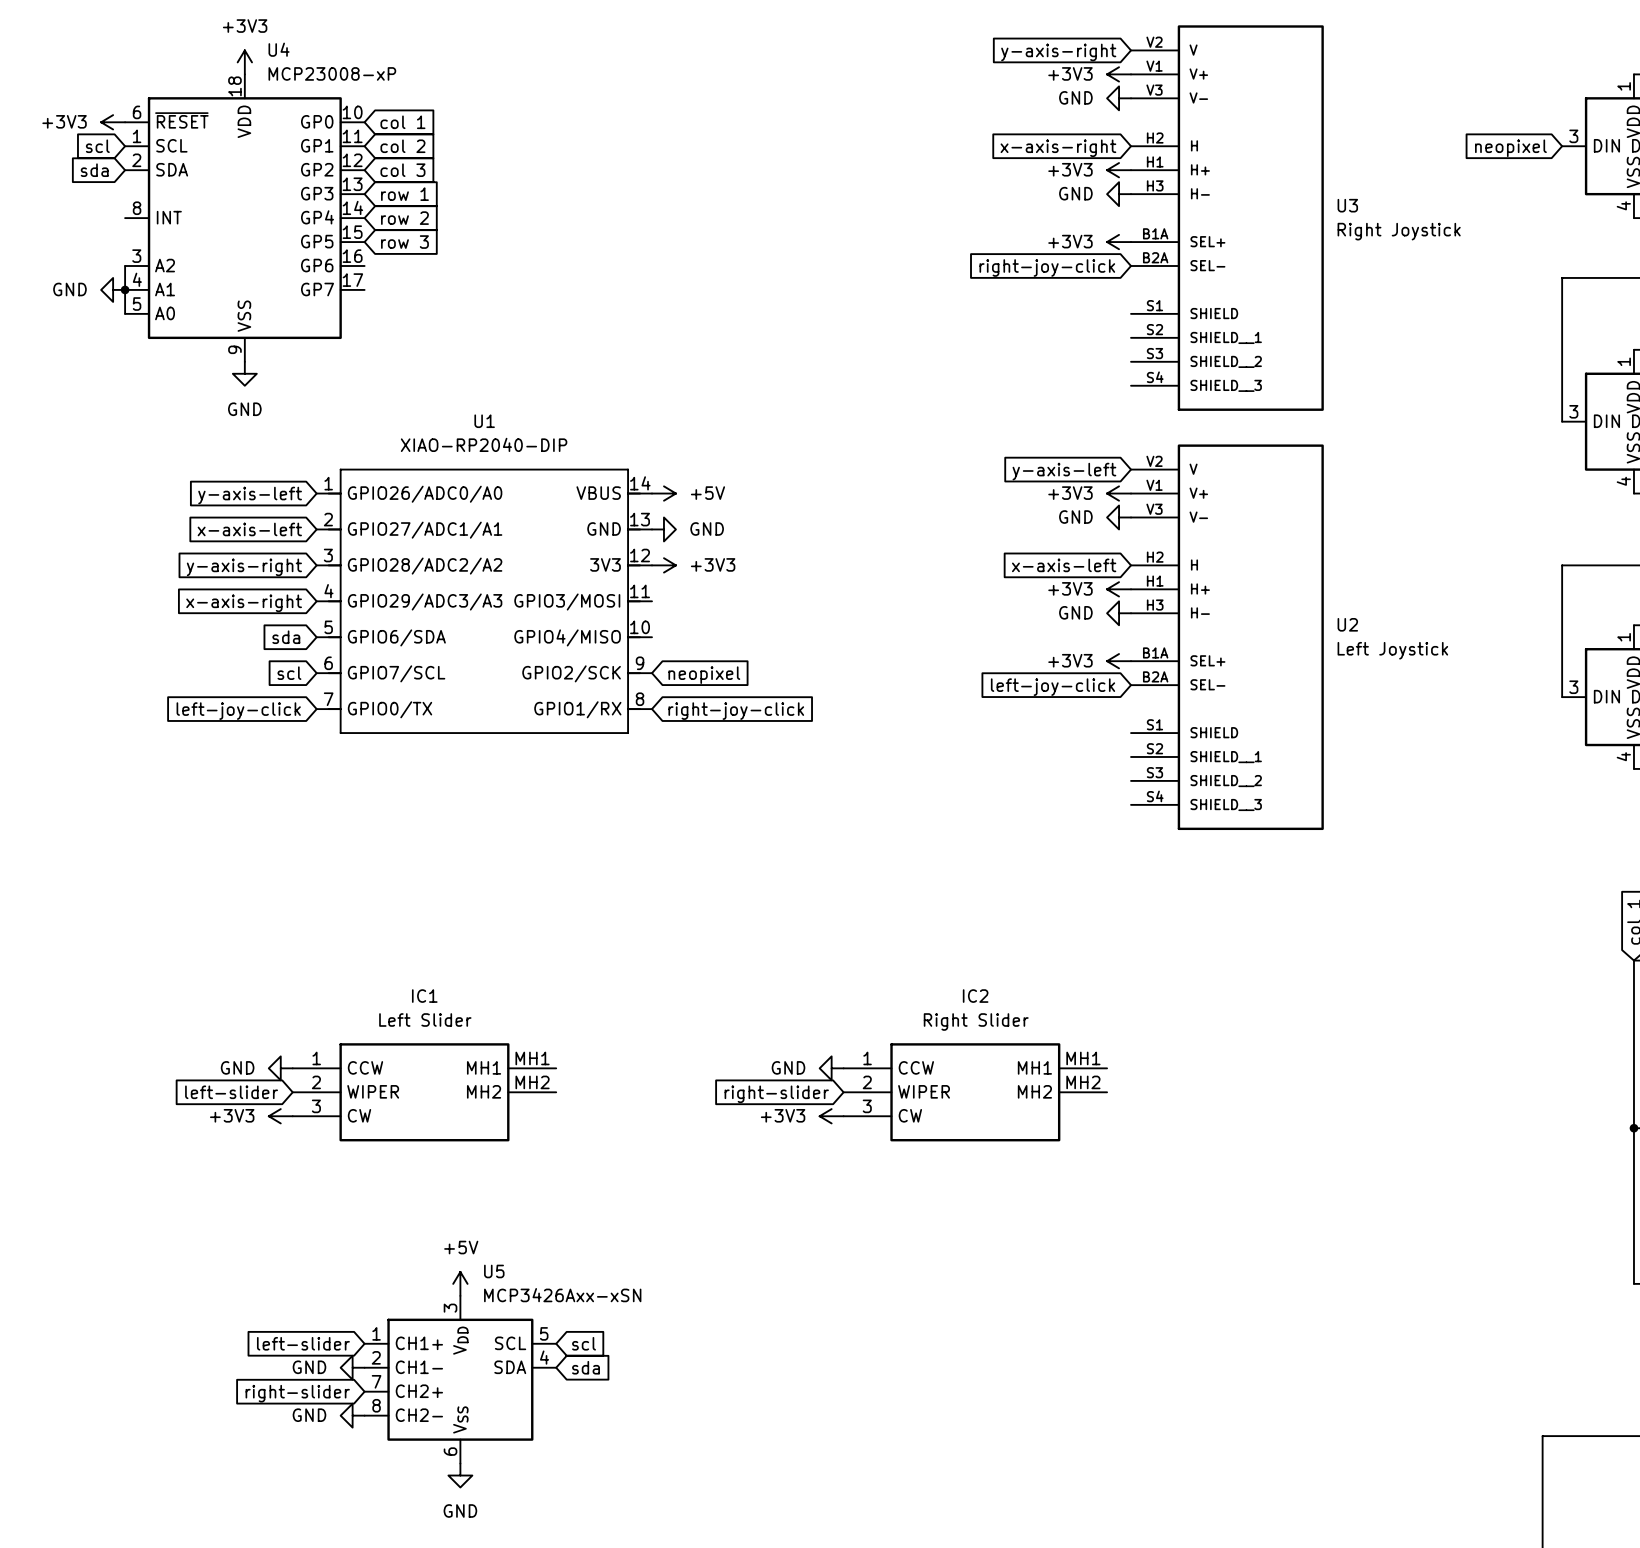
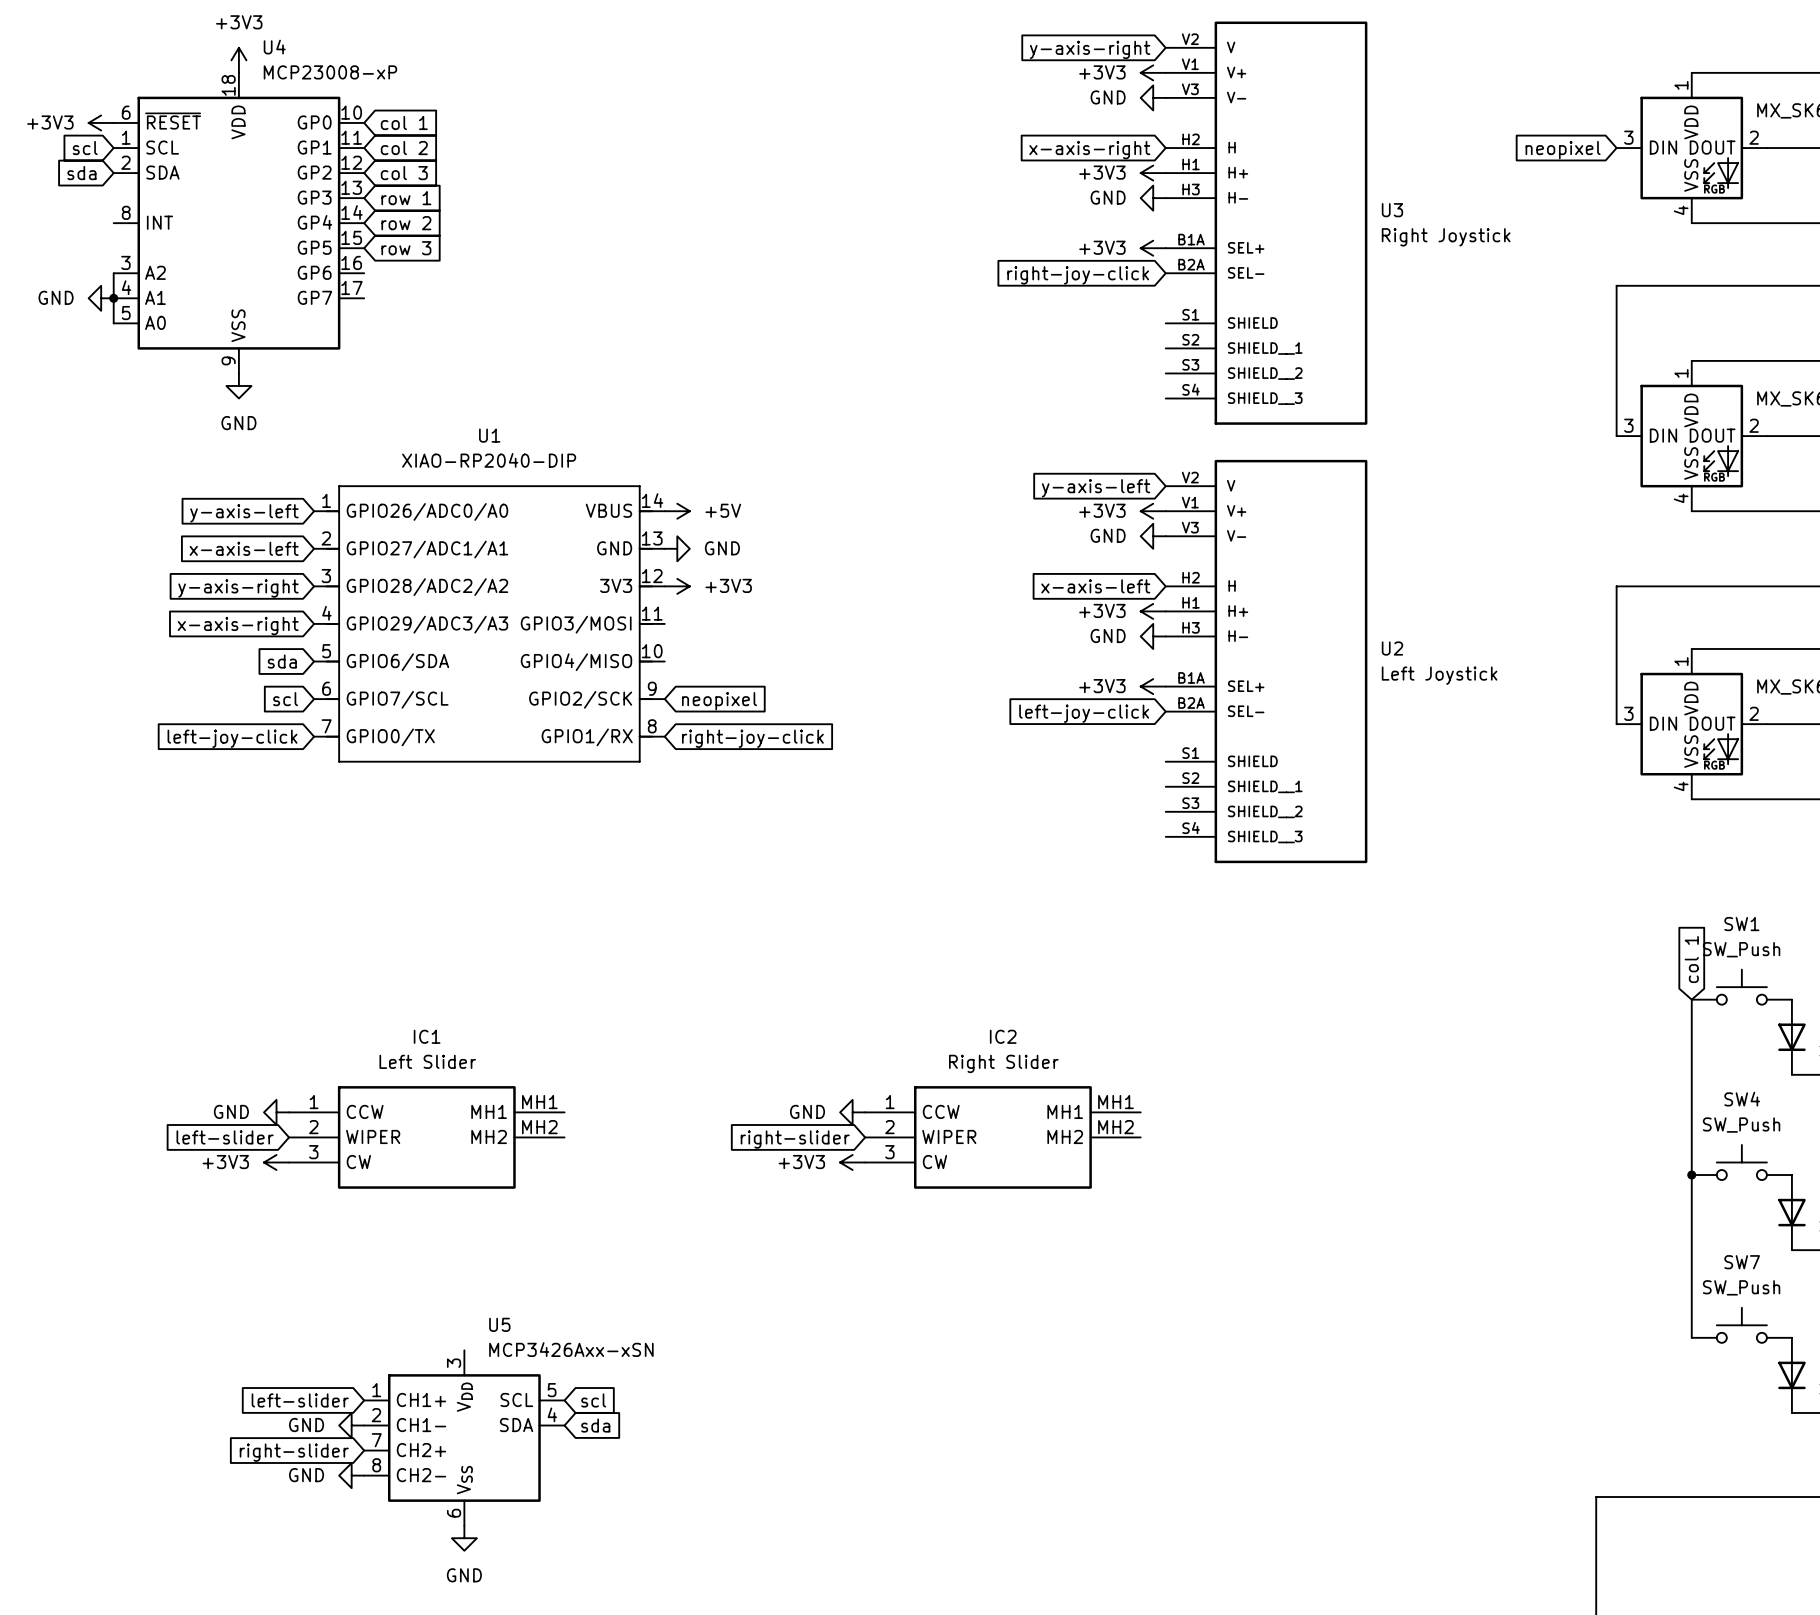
power symbol: +5V (460, 1283) -> none

